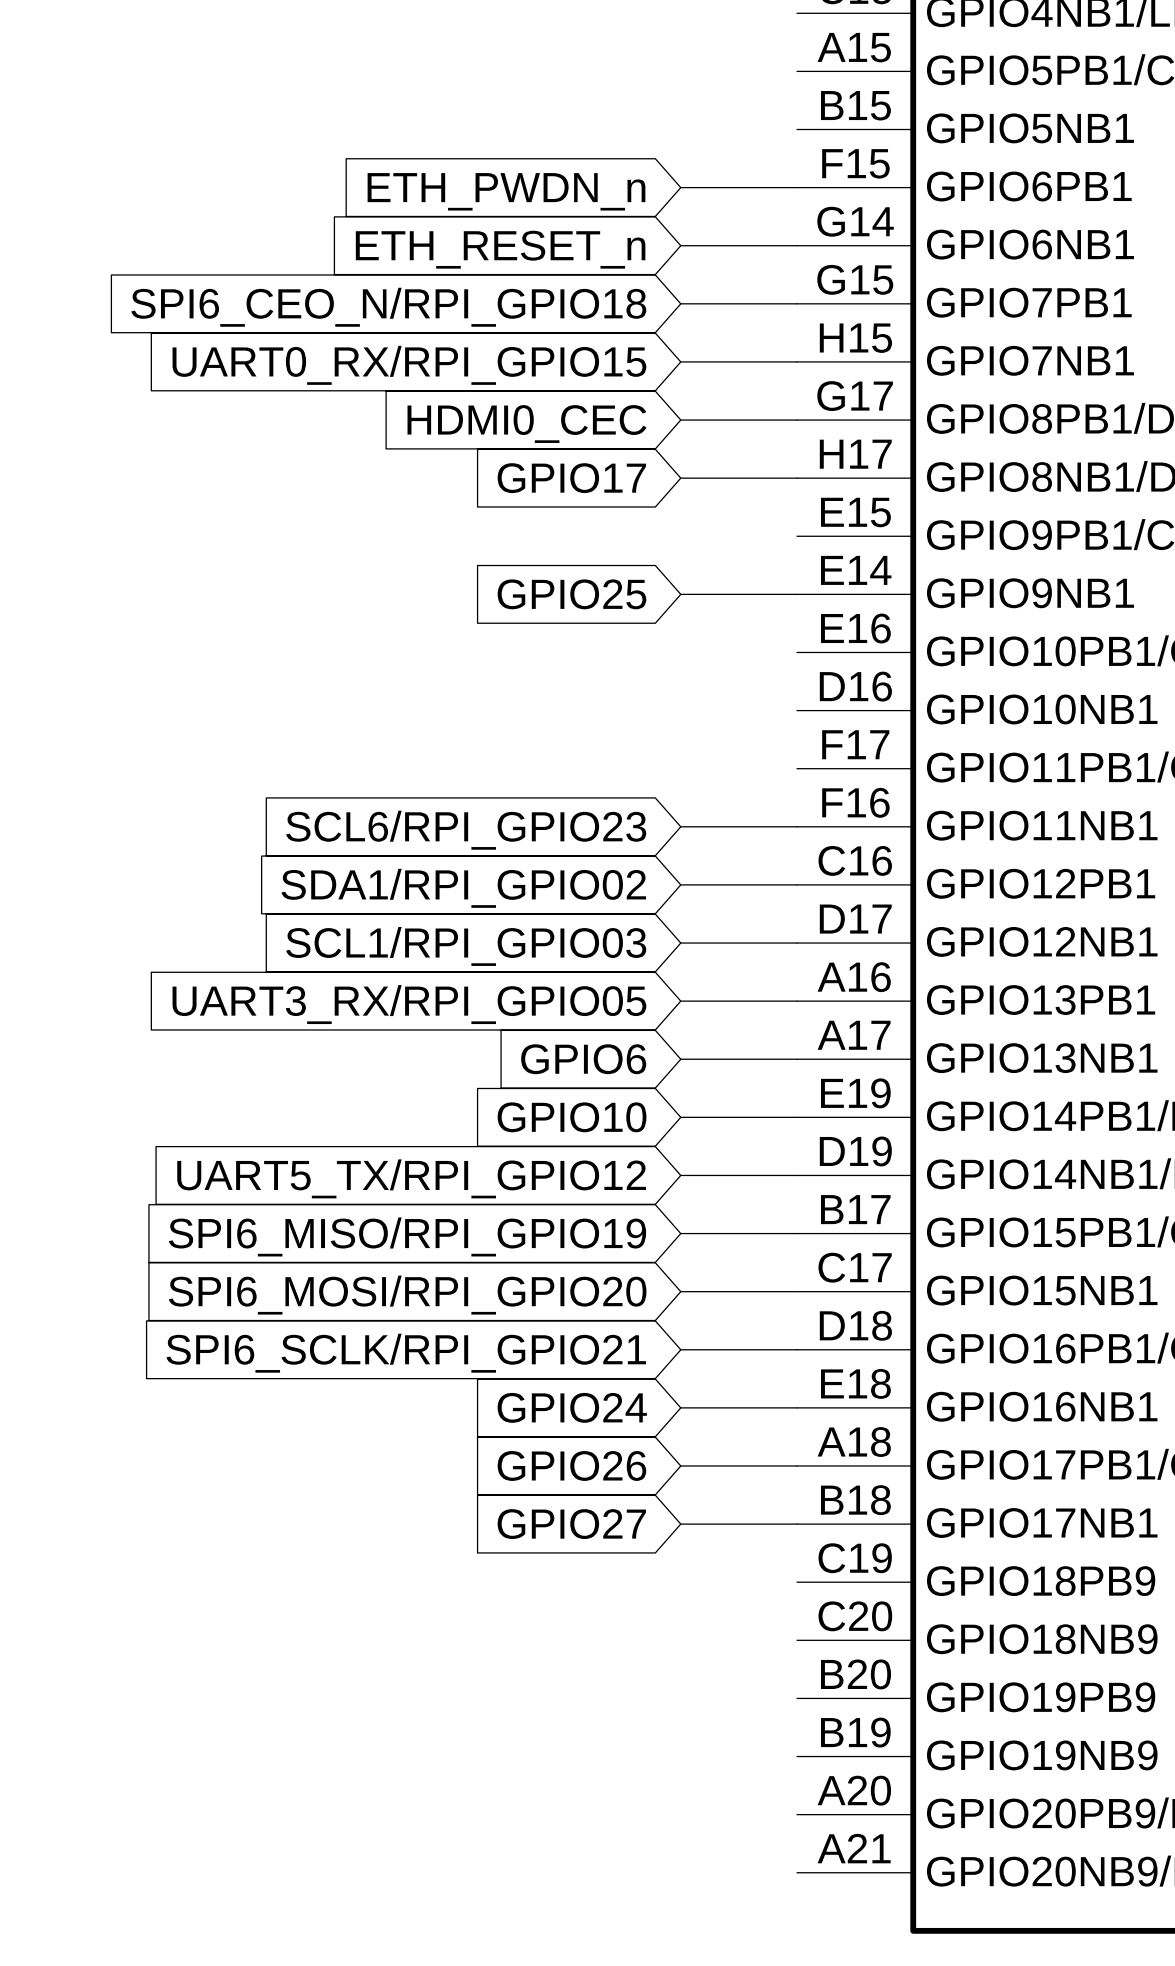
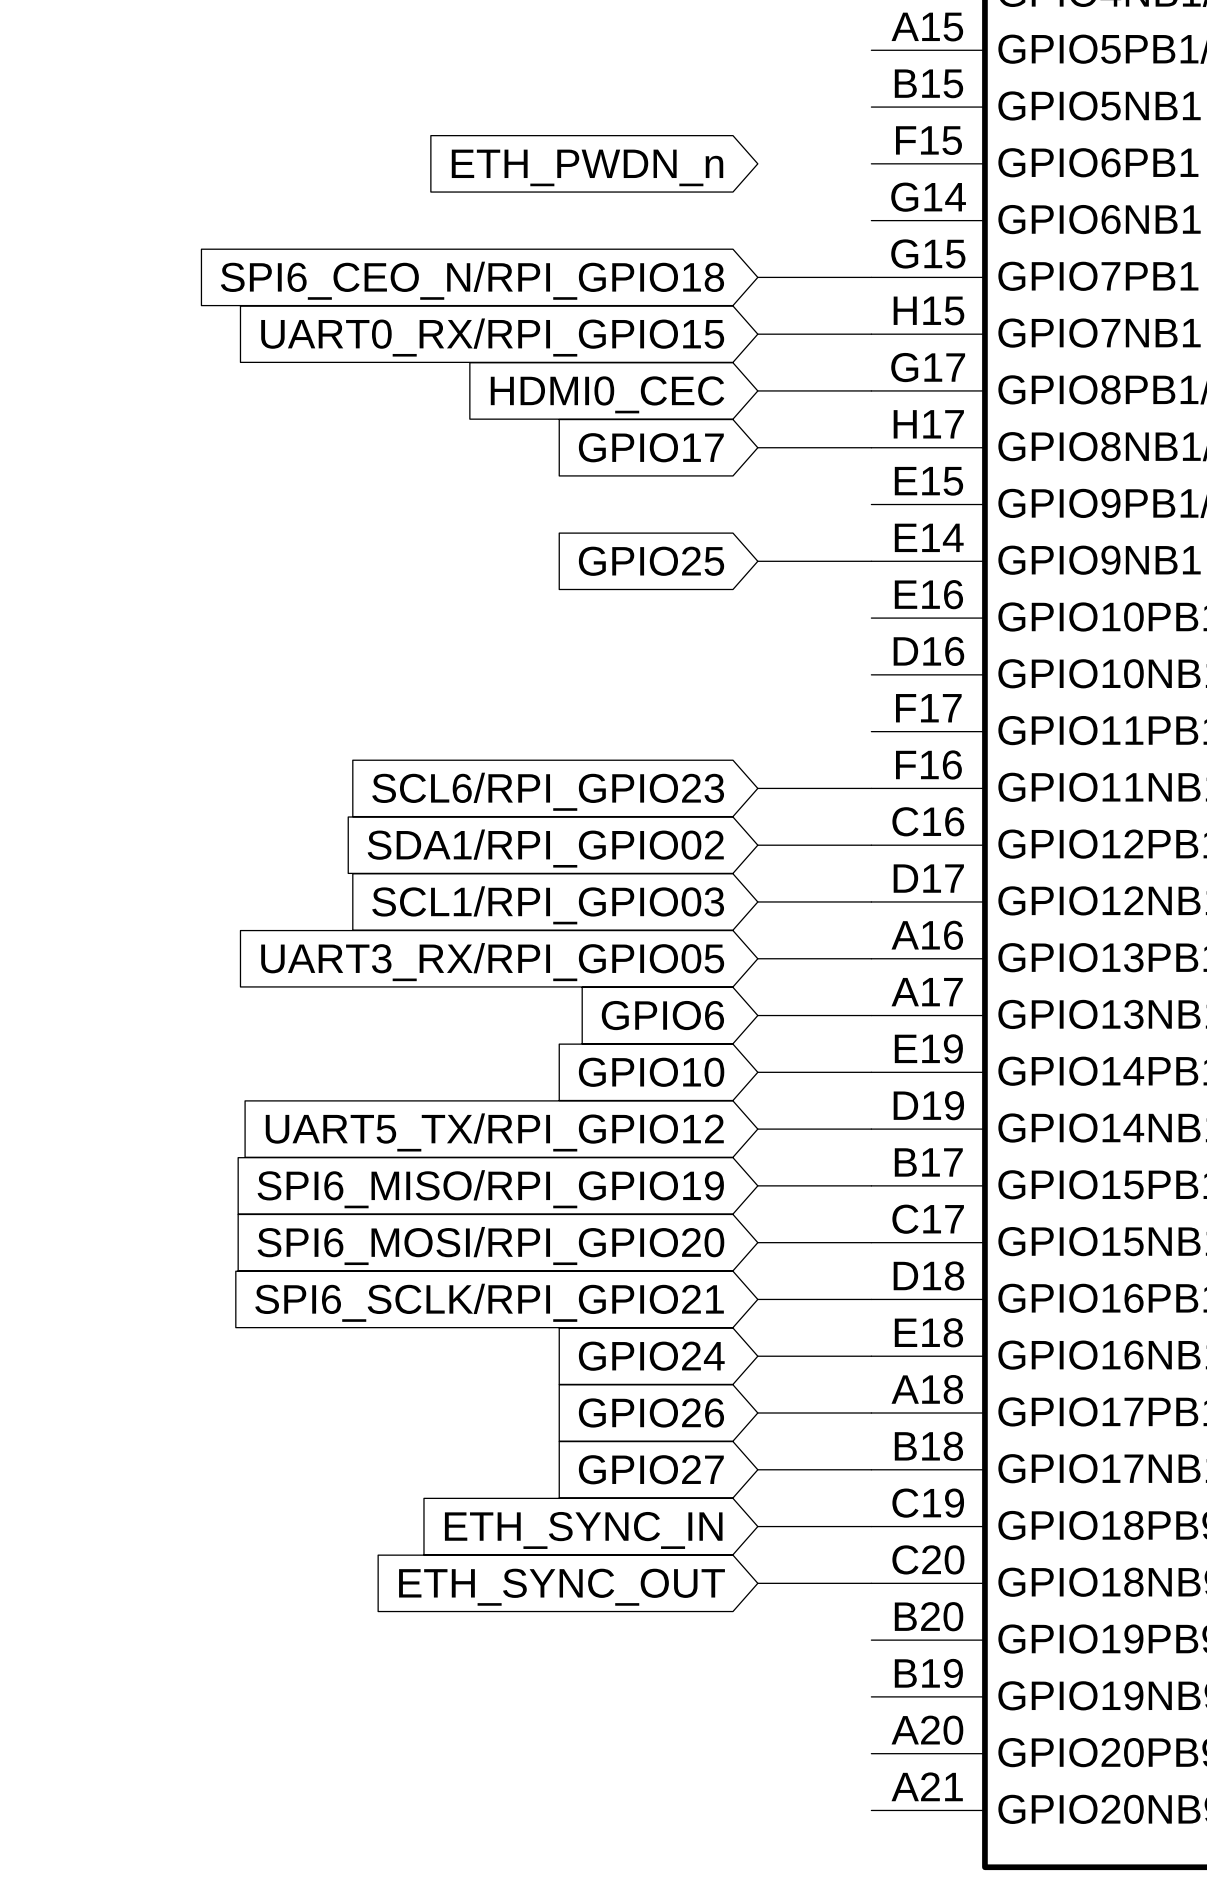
wire: (680, 187) (797, 187) -> none
wire: (680, 245) (797, 245) -> none
global label: ETH_RESET_n (500, 249) -> none
wire: none -> (757, 1526) (871, 1526)
global label: none -> ETH_SYNC_IN (583, 1530)
wire: none -> (757, 1583) (871, 1583)
global label: none -> ETH_SYNC_OUT (562, 1587)

